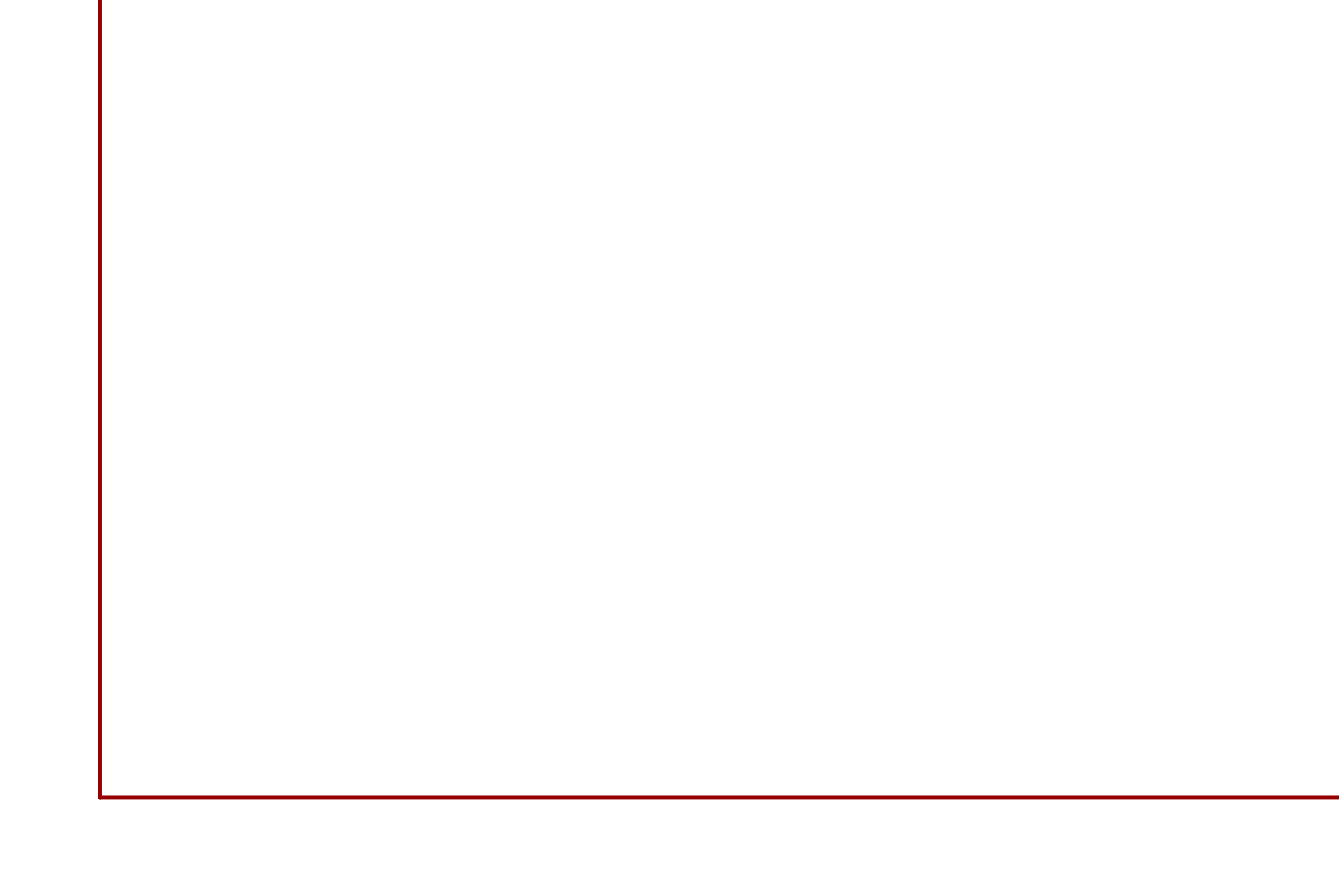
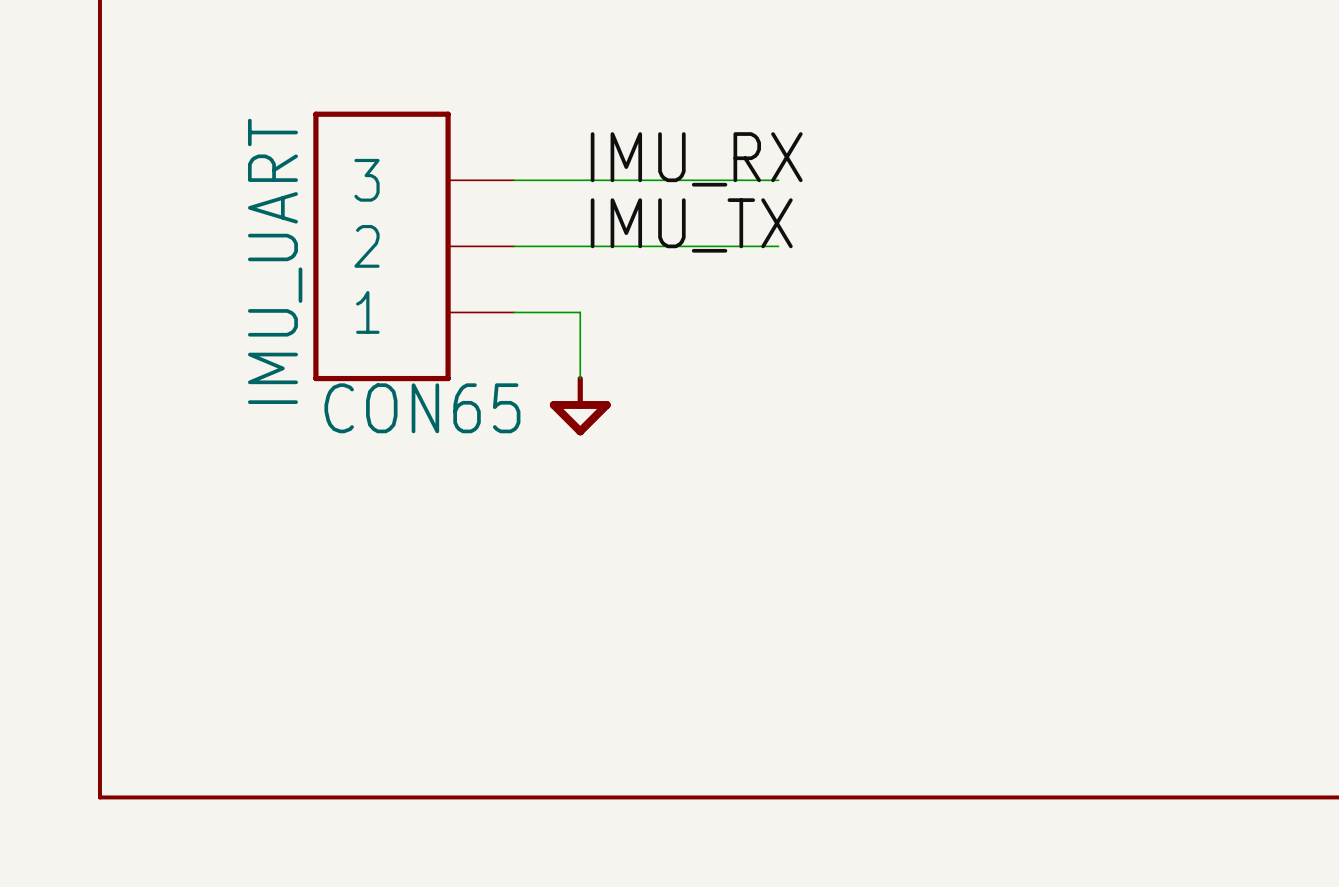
label: none -> IMU_RX (696, 159)
wire: none -> (514, 180) (778, 180)
label: none -> IMU_TX (691, 225)
CON65: none -> IMU_UART (413, 246)
wire: none -> (514, 246) (778, 246)
wire: none -> (514, 312) (580, 312) (580, 378)
power symbol: none -> (580, 405)

